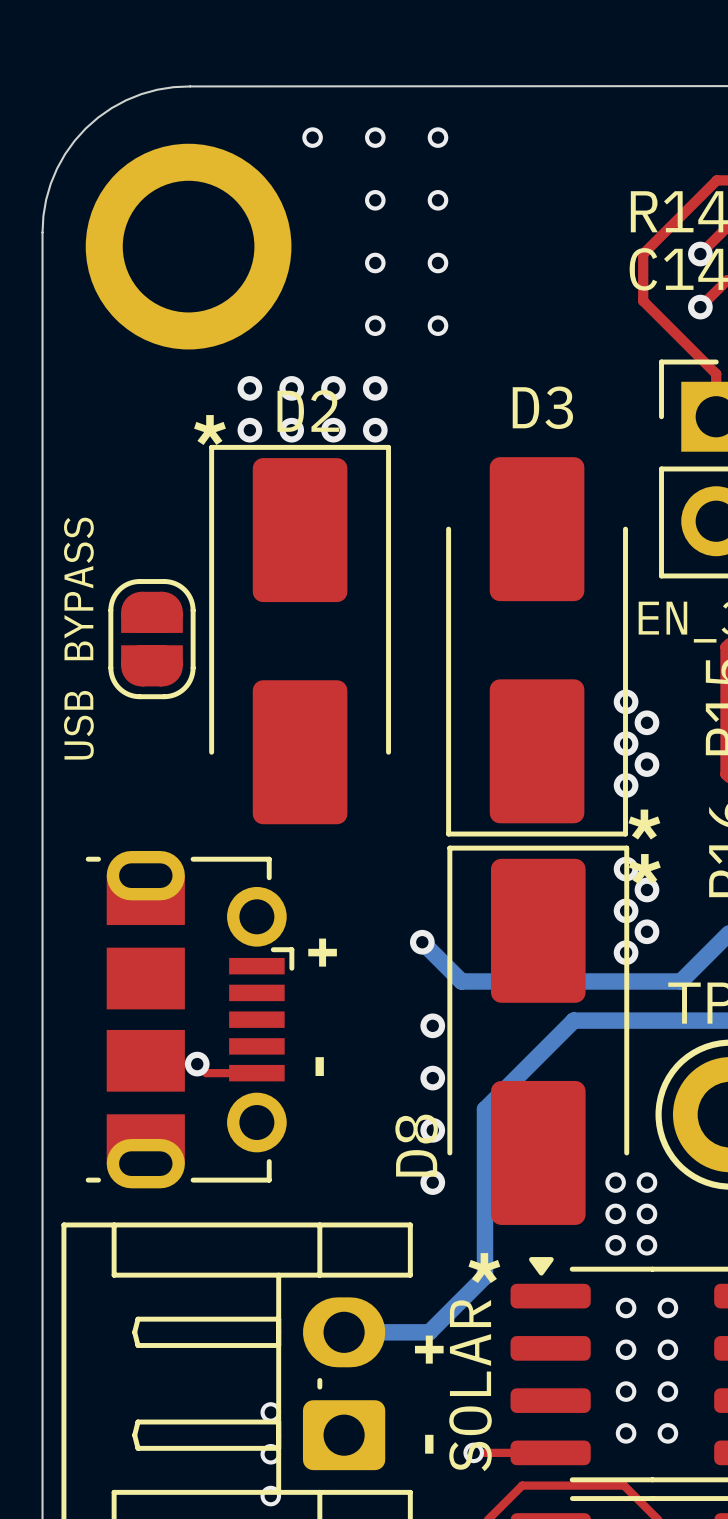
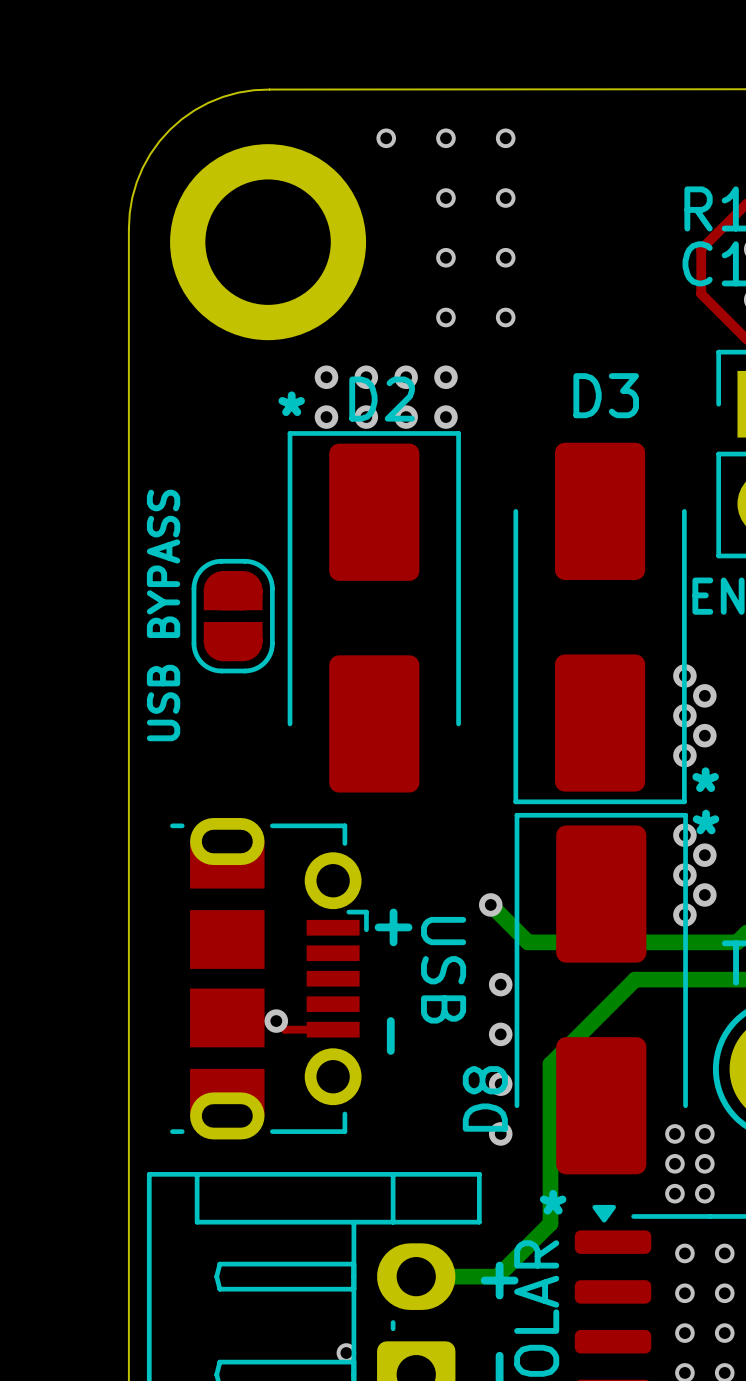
part text: none -> USB (443, 970)

